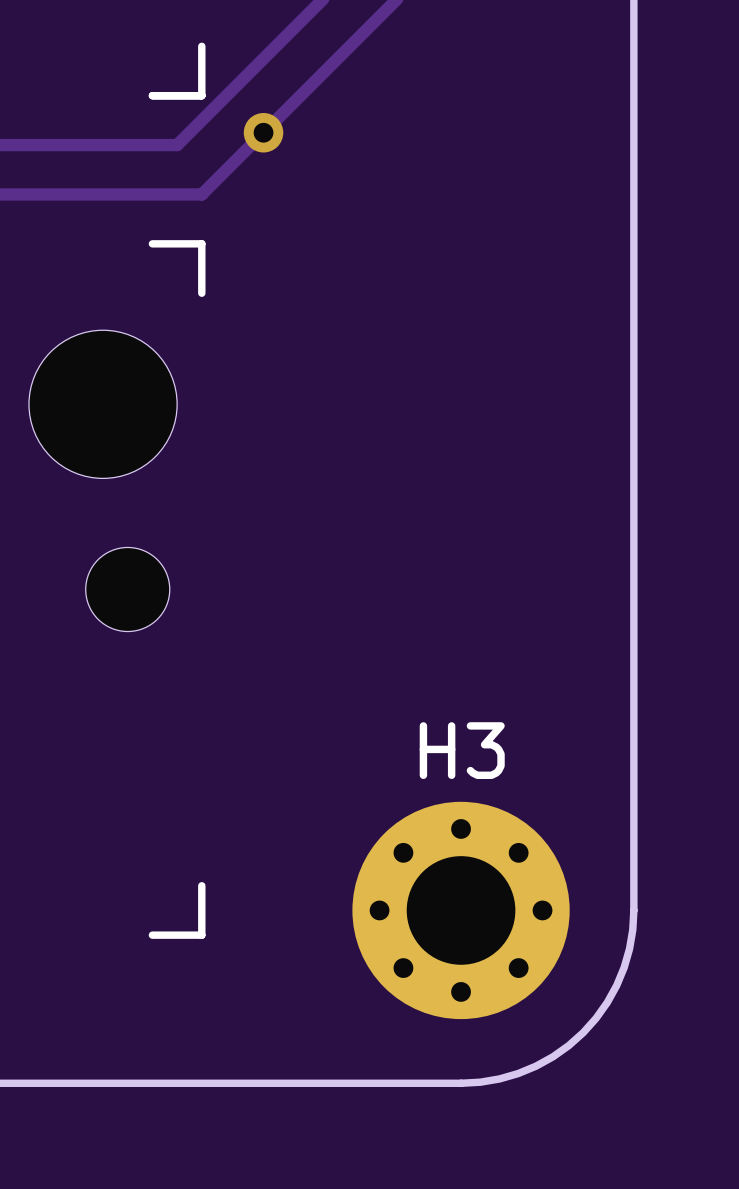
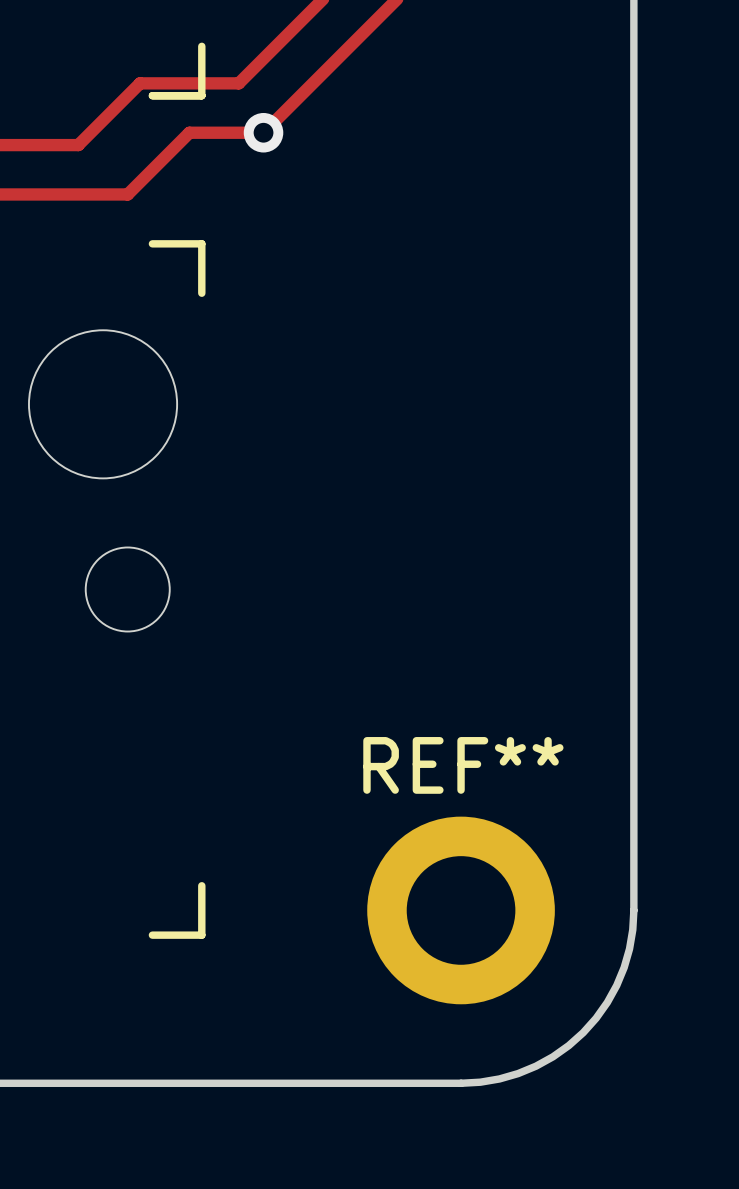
track: (238, 83) (189, 132) -> (263, 132) (189, 132)
track: none -> (238, 83) (140, 83) (78, 145)
track: (263, 132) (201, 194) (127, 194) -> none
track: (78, 145) (177, 145) -> (127, 194) (177, 145)
H3: (461, 910) -> none
REF**: none -> (461, 910)

